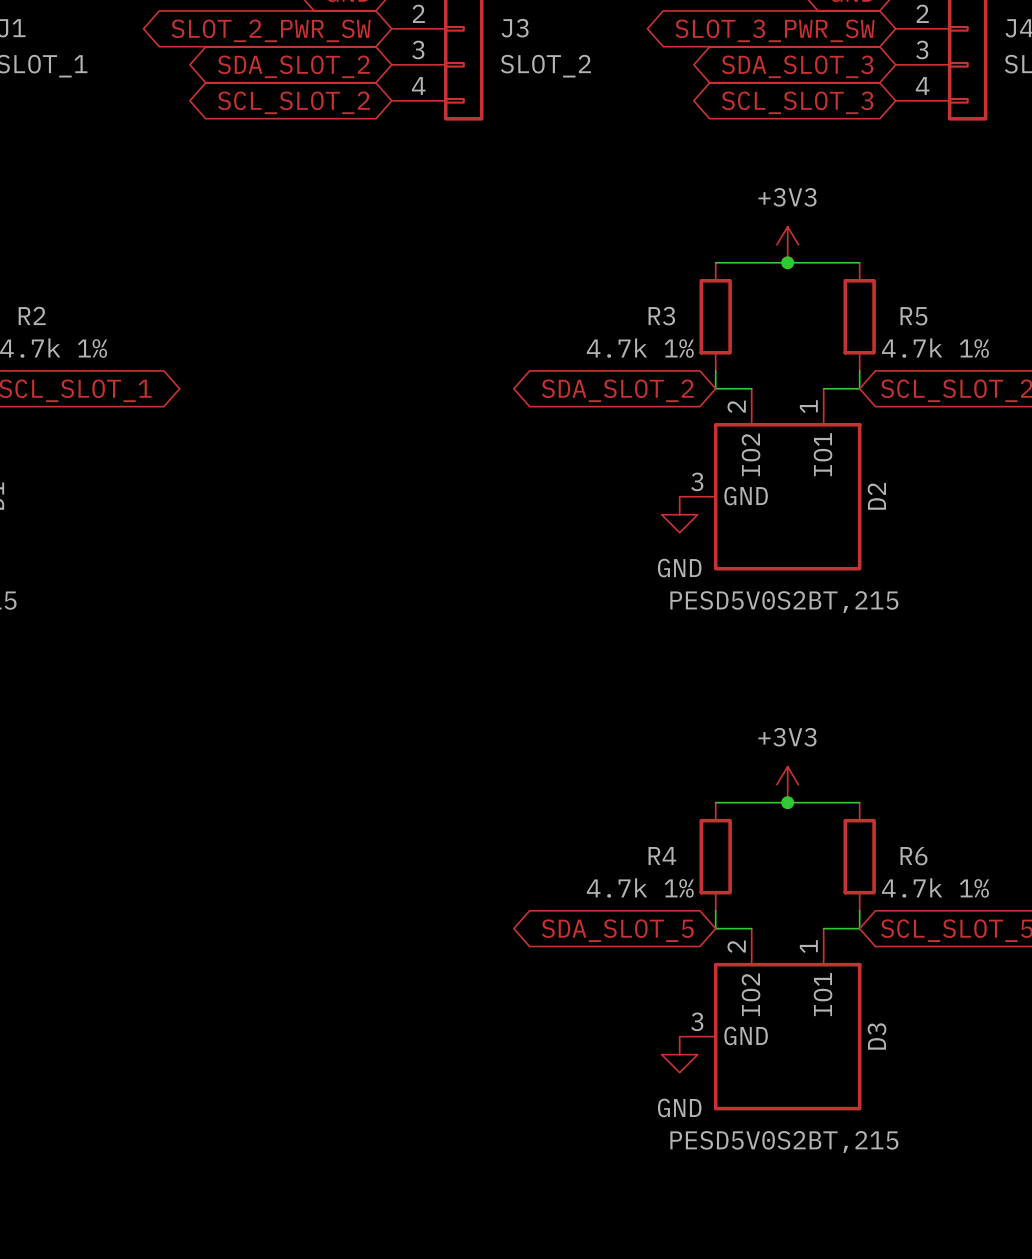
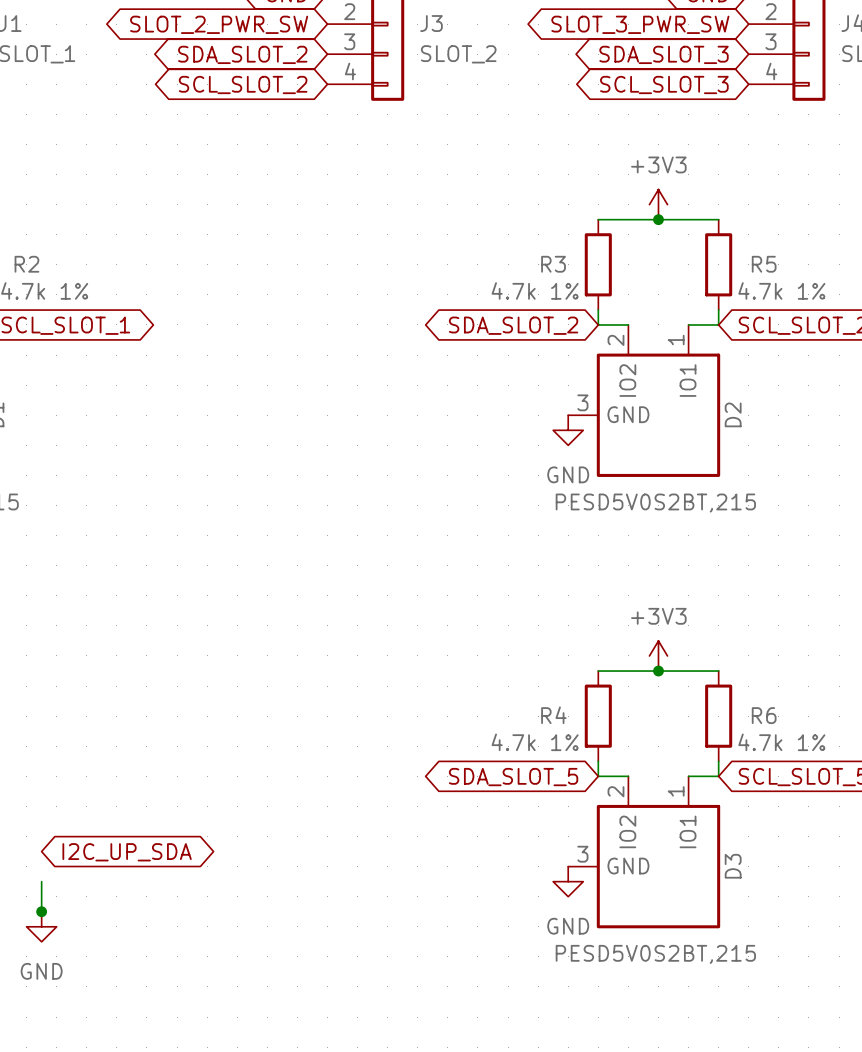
global label: none -> I2C_UP_SDA (127, 852)
wire: none -> (41, 881) (41, 911)
junction: none -> (41, 911)
power symbol: none -> GND (41, 926)

